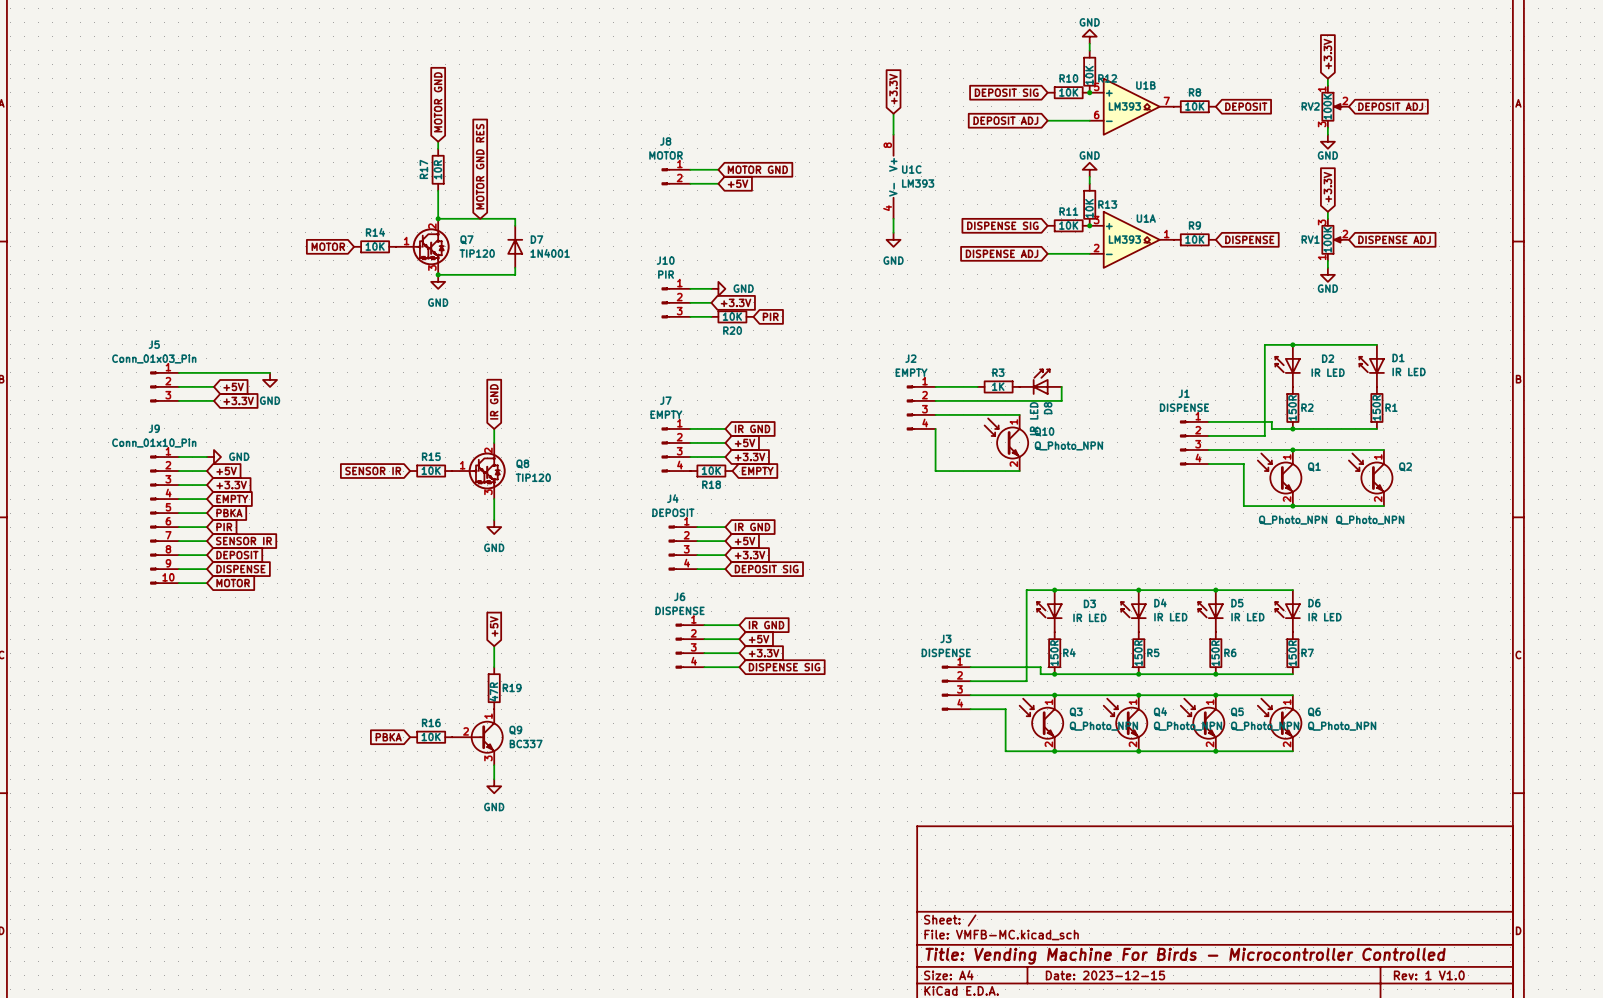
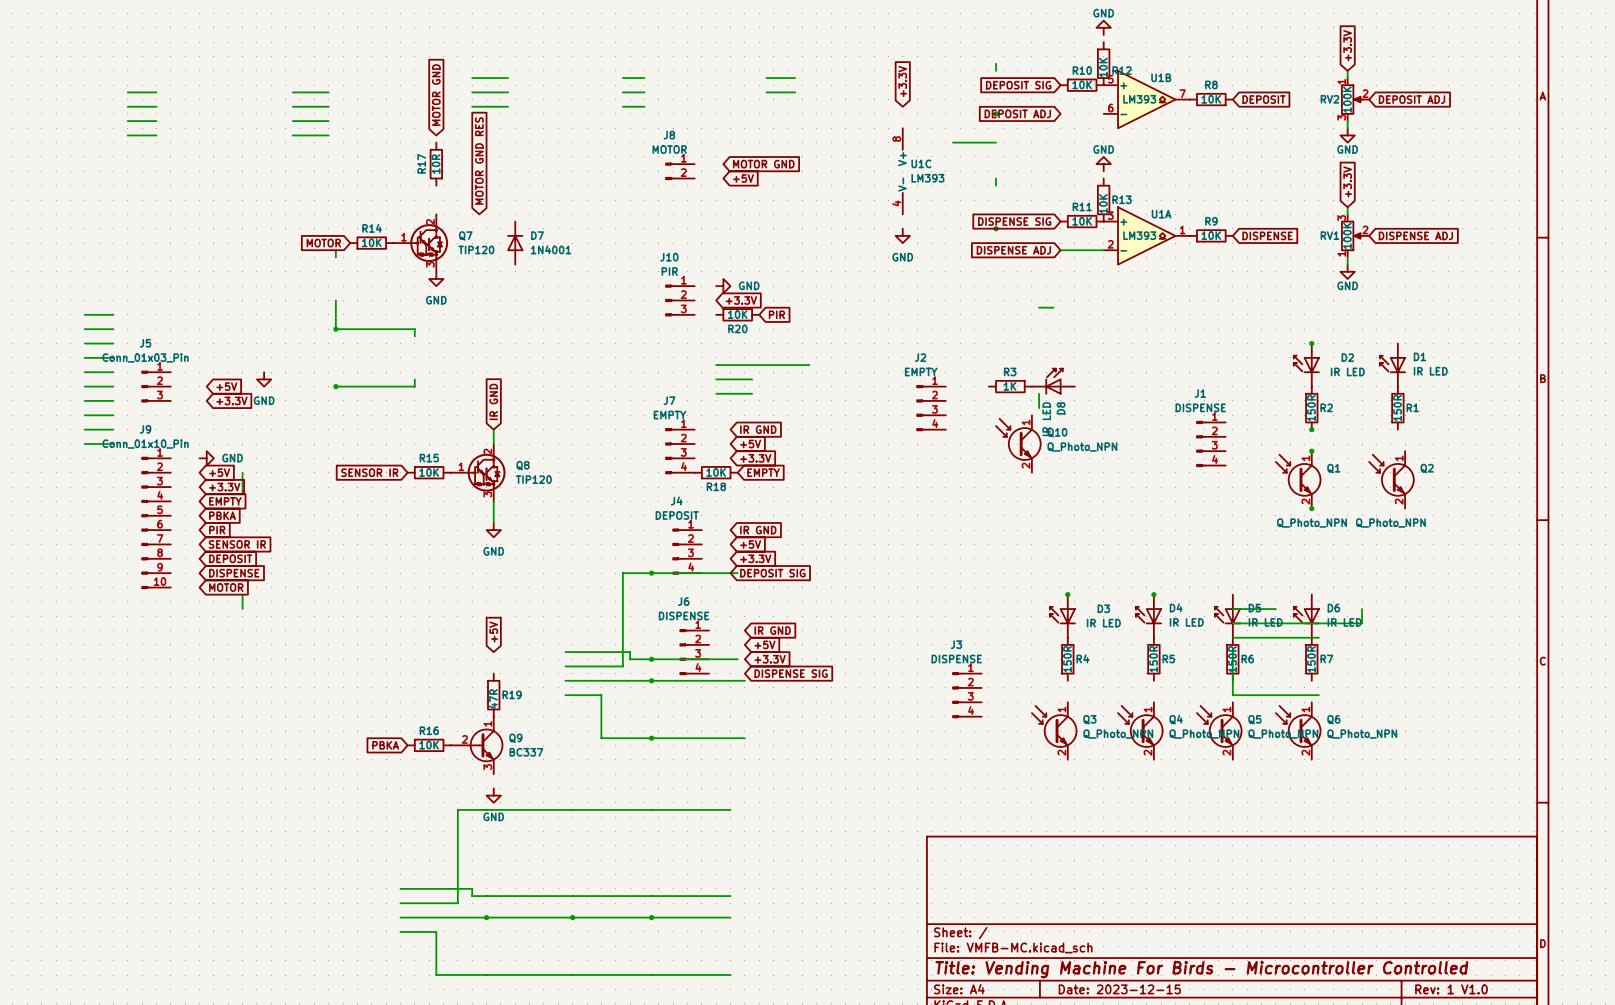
wire: (1089, 43) (1089, 50) -> (996, 63) (996, 70)
wire: none -> (472, 78) (508, 78)
wire: none -> (622, 78) (644, 78)
junction: (1089, 92) -> none
wire: none -> (127, 92) (156, 92)
wire: none -> (292, 92) (328, 92)
wire: none -> (472, 92) (508, 92)
wire: none -> (622, 92) (644, 92)
wire: none -> (127, 106) (156, 106)
wire: none -> (292, 106) (328, 106)
wire: none -> (472, 106) (508, 106)
wire: none -> (622, 106) (644, 106)
wire: (893, 113) (893, 134) -> none
junction: none -> (996, 113)
wire: (1047, 120) (1089, 120) -> (952, 142) (996, 142)
wire: none -> (127, 121) (156, 121)
wire: none -> (292, 121) (328, 121)
wire: none -> (127, 135) (156, 135)
wire: none -> (292, 135) (328, 135)
wire: (438, 141) (438, 148) -> none
wire: (690, 169) (718, 169) -> (766, 78) (795, 78)
wire: (1089, 176) (1089, 183) -> (996, 178) (996, 185)
wire: (690, 183) (718, 183) -> (766, 92) (795, 92)
wire: (438, 190) (438, 218) (515, 218) (515, 225) -> none
junction: (438, 218) -> none
wire: (893, 218) (893, 232) -> none
junction: (1089, 225) -> none
junction: none -> (996, 228)
wire: none -> (335, 250) (335, 257)
wire: (515, 267) (515, 274) (438, 274) -> none
junction: (438, 274) -> none
wire: (690, 288) (711, 288) -> none
wire: none -> (335, 300) (335, 329) (414, 329) (414, 336)
wire: (690, 302) (711, 302) -> none
wire: none -> (1039, 307) (1053, 307)
wire: none -> (84, 314) (113, 314)
wire: (690, 316) (711, 316) -> none
wire: none -> (84, 329) (113, 329)
junction: none -> (335, 329)
wire: none -> (84, 343) (113, 343)
wire: (1376, 344) (1264, 344) (1264, 435) (1208, 435) -> none
wire: none -> (716, 365) (809, 365)
wire: (178, 372) (270, 372) -> none
wire: none -> (414, 379) (414, 386) (335, 386)
wire: (178, 386) (213, 386) -> none
junction: none -> (335, 386)
wire: (935, 386) (977, 386) -> none
wire: (1061, 386) (1061, 400) (935, 400) -> none
wire: none -> (1039, 393) (1039, 408)
wire: (178, 400) (213, 400) -> none
wire: (935, 414) (1019, 414) -> none
wire: (1208, 421) (1271, 421) (1271, 428) (1376, 428) -> none
wire: (690, 428) (725, 428) -> (716, 379) (752, 379)
wire: (935, 428) (935, 471) (1019, 471) -> none
wire: (690, 442) (725, 442) -> (716, 393) (752, 393)
wire: (1208, 450) (1383, 450) -> none
wire: (178, 457) (206, 457) -> (84, 357) (113, 357)
wire: (690, 457) (725, 457) -> none
wire: (1208, 464) (1243, 464) (1243, 506) (1383, 506) -> none
wire: (178, 471) (206, 471) -> (84, 372) (113, 372)
wire: none -> (242, 472) (242, 494)
wire: (178, 485) (206, 485) -> (84, 386) (113, 386)
wire: (178, 499) (206, 499) -> (84, 400) (113, 400)
wire: (178, 513) (206, 513) -> (84, 415) (113, 415)
wire: (178, 527) (206, 527) -> (84, 429) (113, 429)
wire: (697, 527) (725, 527) -> none
wire: (178, 541) (206, 541) -> (84, 444) (113, 444)
wire: (697, 541) (725, 541) -> none
wire: (178, 555) (206, 555) -> none
wire: (697, 555) (725, 555) -> none
wire: (178, 569) (206, 569) -> none
junction: none -> (651, 573)
wire: none -> (701, 573) (622, 573) (622, 666) (565, 666)
wire: (178, 583) (206, 583) -> none
wire: none -> (242, 594) (242, 609)
junction: (1215, 590) -> none
wire: (1292, 590) (1026, 590) (1026, 681) (970, 681) -> none
wire: none -> (1232, 609) (1275, 609)
wire: none -> (1362, 609) (1362, 623) (1232, 623)
wire: (704, 625) (739, 625) -> none
wire: none -> (1232, 637) (1318, 637)
wire: (704, 639) (739, 639) -> none
wire: (494, 646) (494, 667) -> none
wire: none -> (565, 652) (630, 652) (630, 659) (709, 659)
wire: none -> (1232, 652) (1232, 695) (1318, 695)
junction: none -> (651, 659)
wire: (732, 653) (739, 653) -> (730, 573) (737, 573)
wire: (704, 667) (739, 667) -> none
wire: (970, 667) (1040, 667) (1040, 674) (1292, 674) -> none
wire: none -> (565, 680) (744, 680)
junction: none -> (651, 680)
junction: (1054, 674) -> none
junction: (1138, 674) -> none
junction: (1215, 674) -> none
wire: none -> (565, 695) (601, 695) (601, 738) (744, 738)
wire: (970, 695) (1292, 695) -> none
junction: (1054, 695) -> none
junction: (1138, 695) -> none
junction: (1215, 695) -> none
wire: (970, 709) (1005, 709) (1005, 751) (1292, 751) -> none
junction: none -> (651, 738)
junction: (1054, 751) -> none
junction: (1138, 751) -> none
junction: (1215, 751) -> none
wire: (494, 765) (494, 779) -> none
wire: none -> (730, 809) (457, 809) (457, 903) (400, 903)
wire: none -> (400, 888) (472, 888) (472, 896) (730, 896)
wire: none -> (400, 917) (730, 917)
junction: none -> (486, 917)
junction: none -> (572, 917)
junction: none -> (651, 917)
wire: none -> (400, 931) (436, 931) (436, 975) (730, 975)

